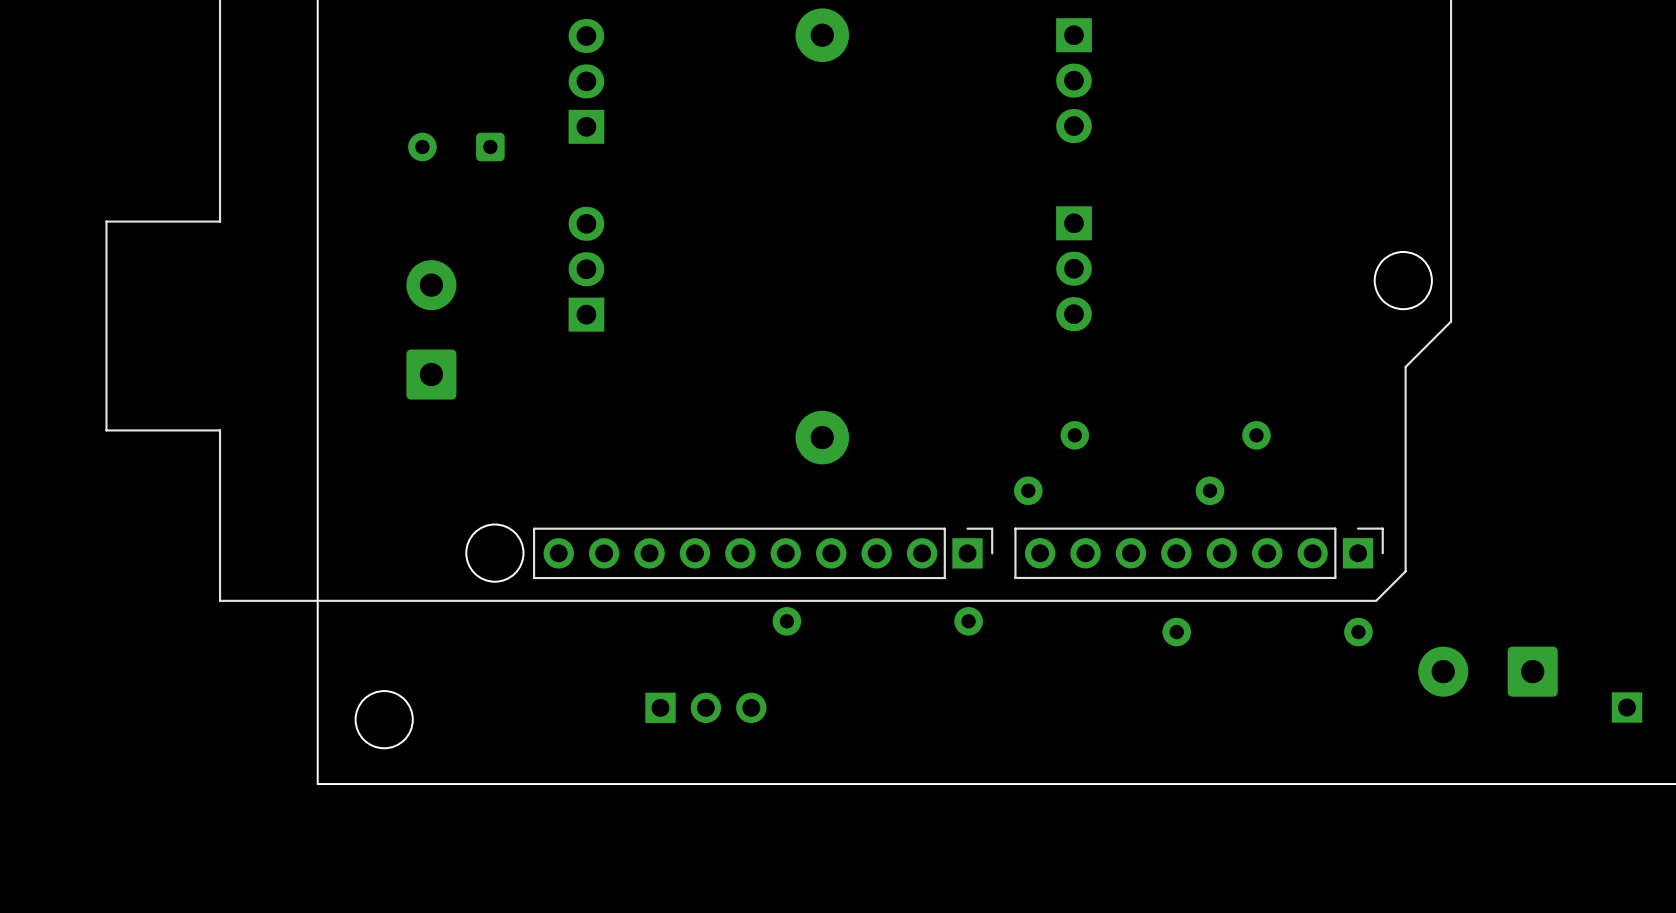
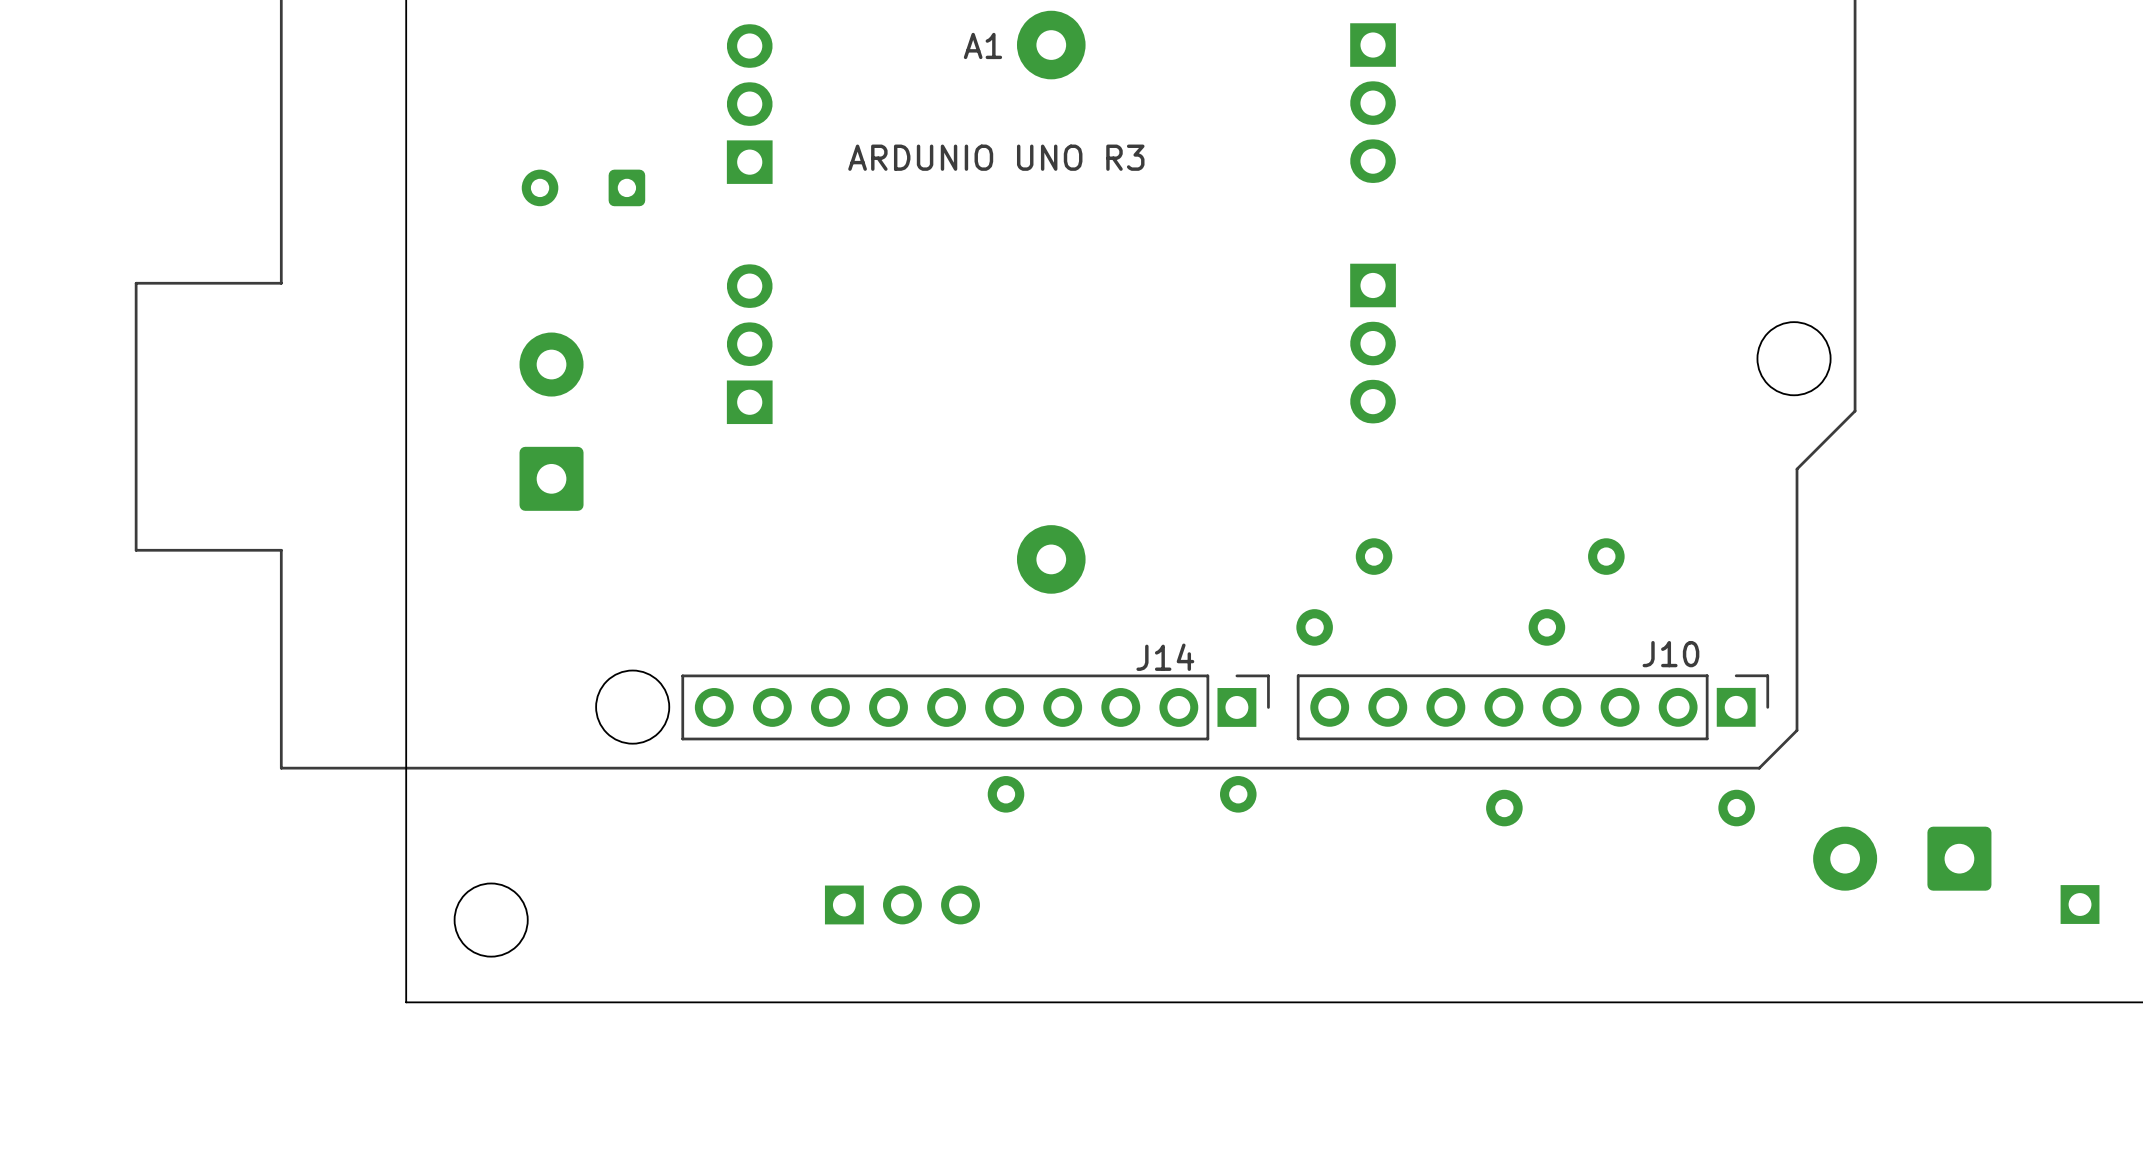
A1 name: none -> A1 (982, 45)
text: none -> ARDUNIO UNO R3 (996, 157)
J10 name: none -> J10 (1670, 654)
J14 name: none -> J14 (1165, 657)

